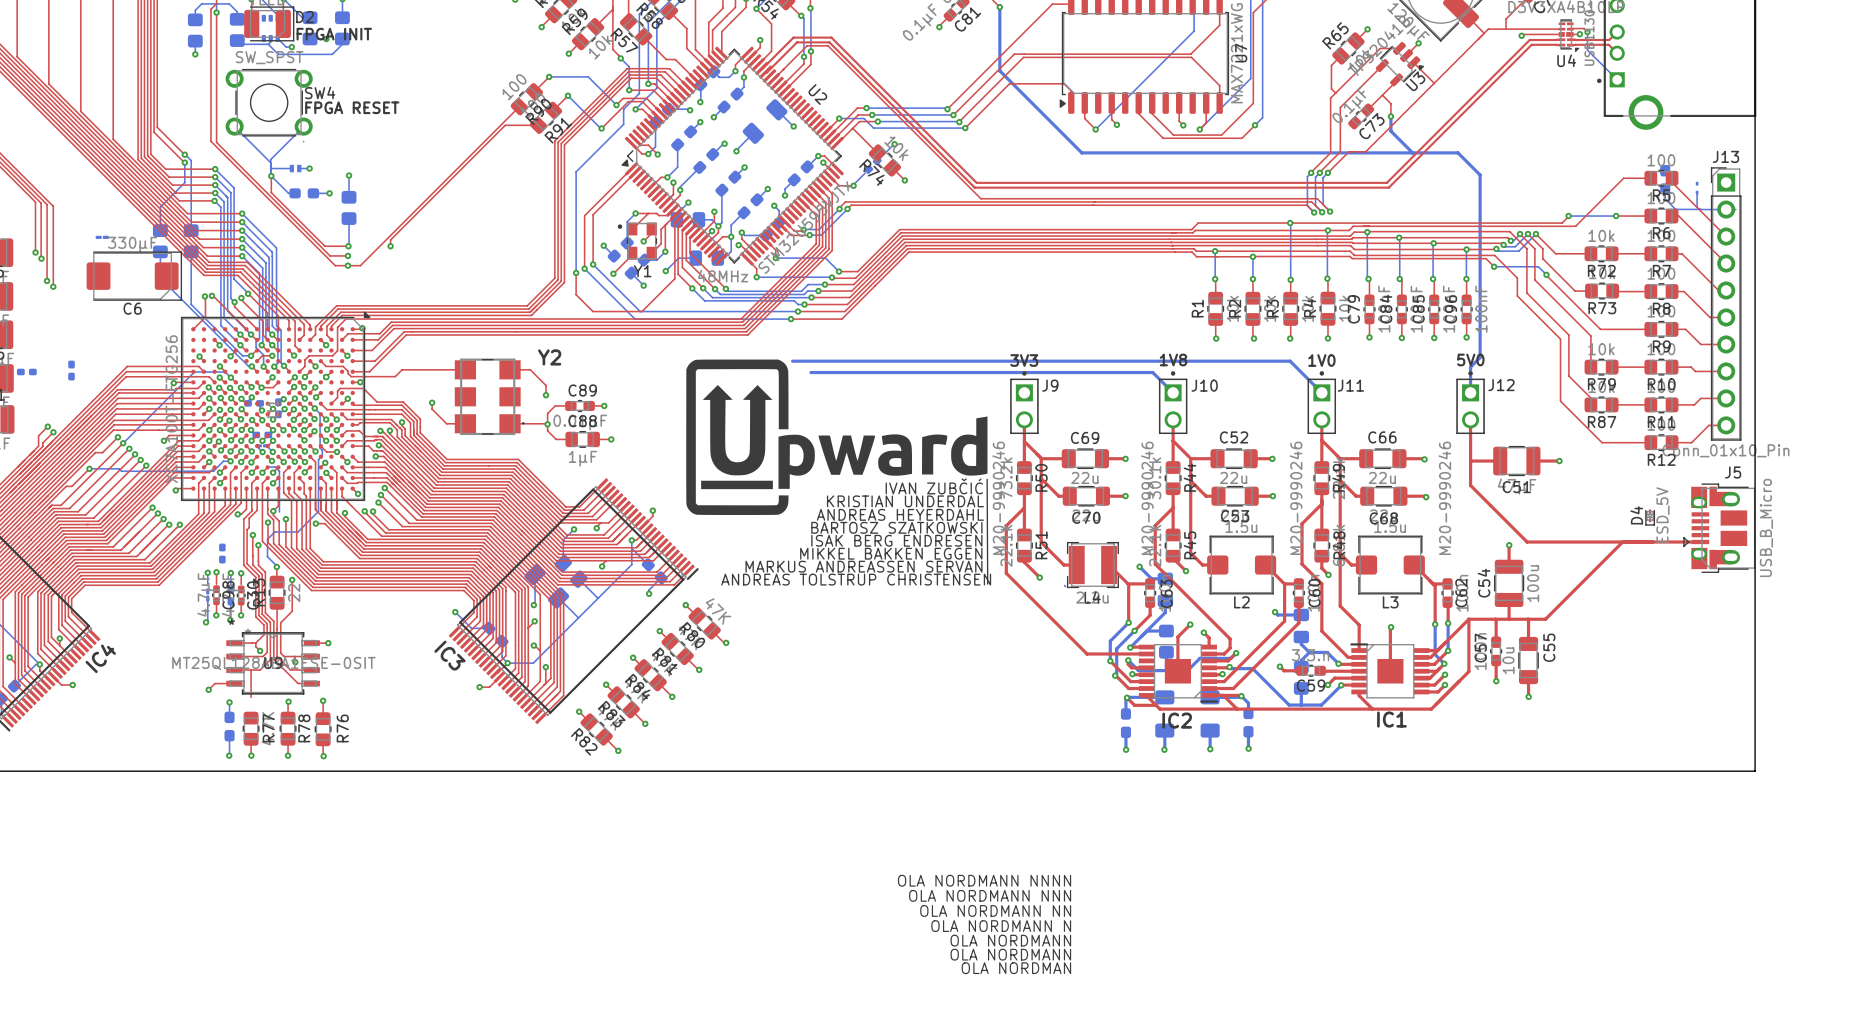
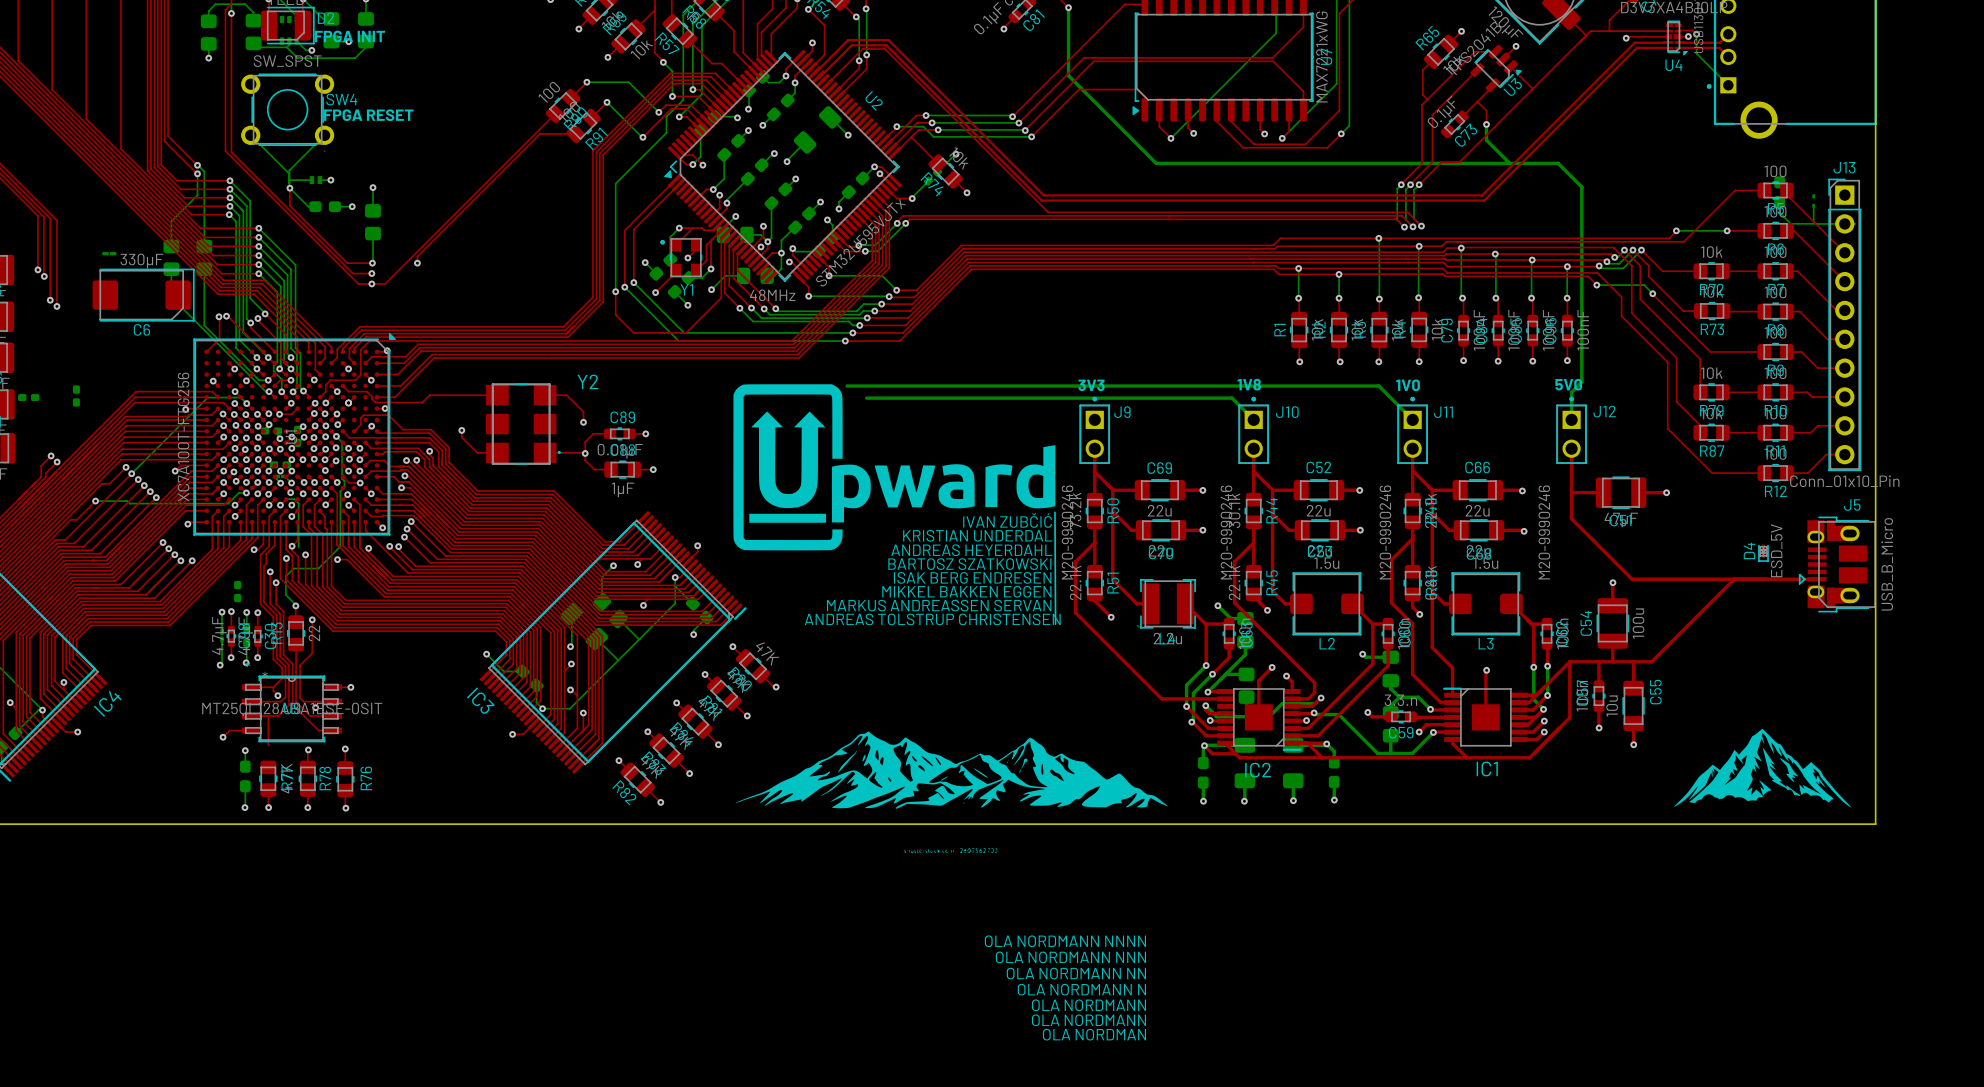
drawing: none -> [1673, 728, 1852, 808]
drawing: none -> [735, 731, 1168, 854]

